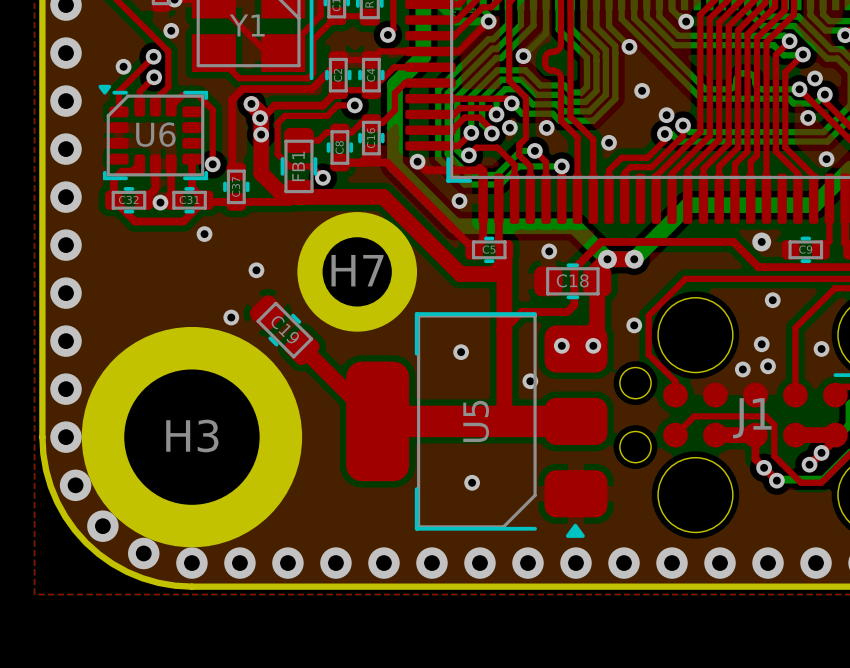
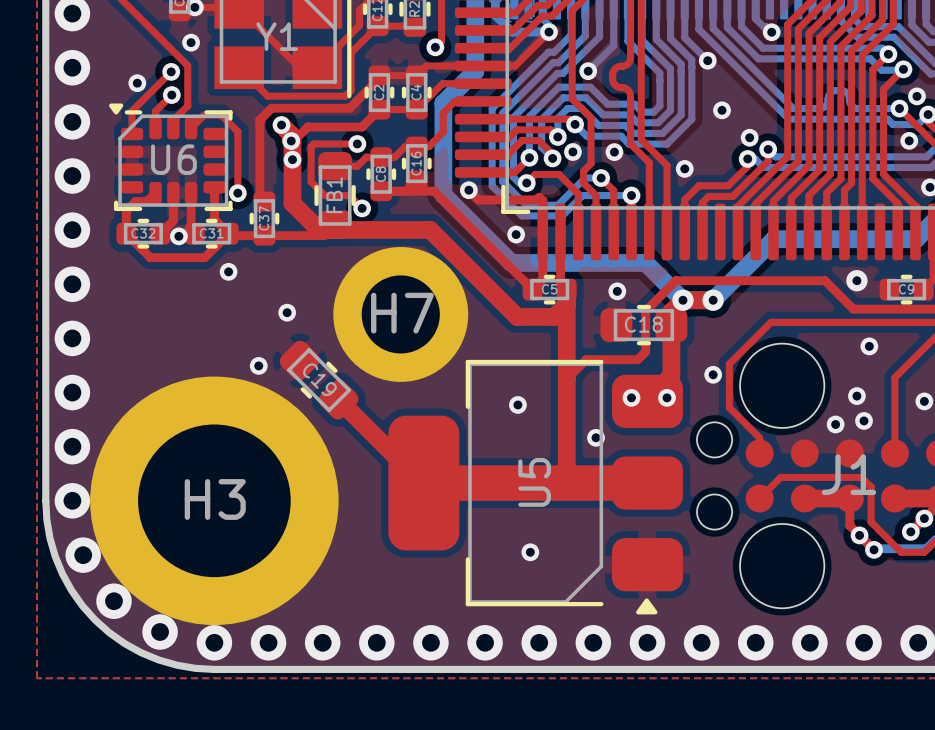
top track: (354, 105) (337, 105) (327, 115) (284, 115) (280, 120) -> (357, 143) (313, 143)
via position: (354, 105) -> (357, 143)

